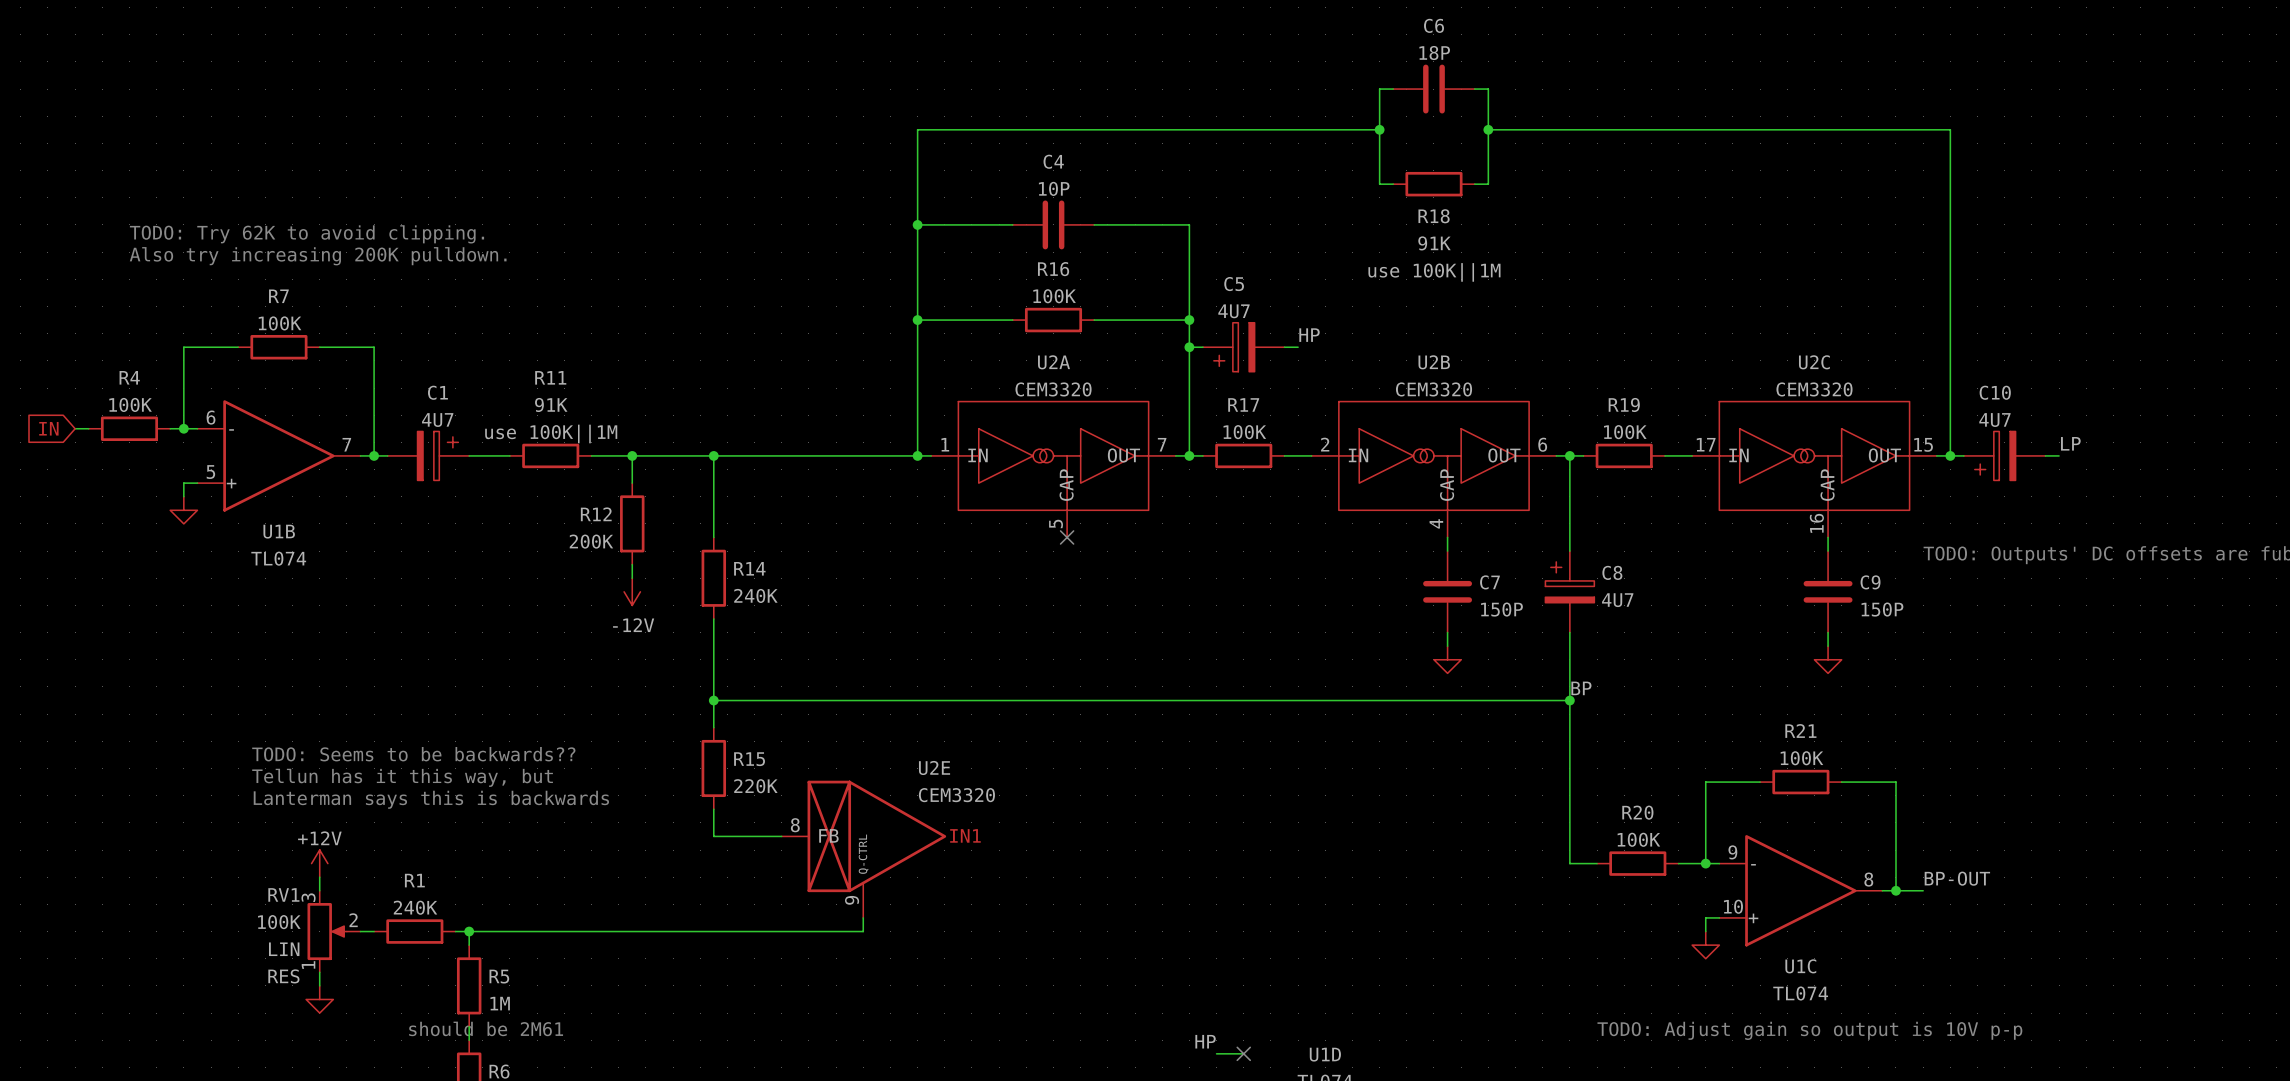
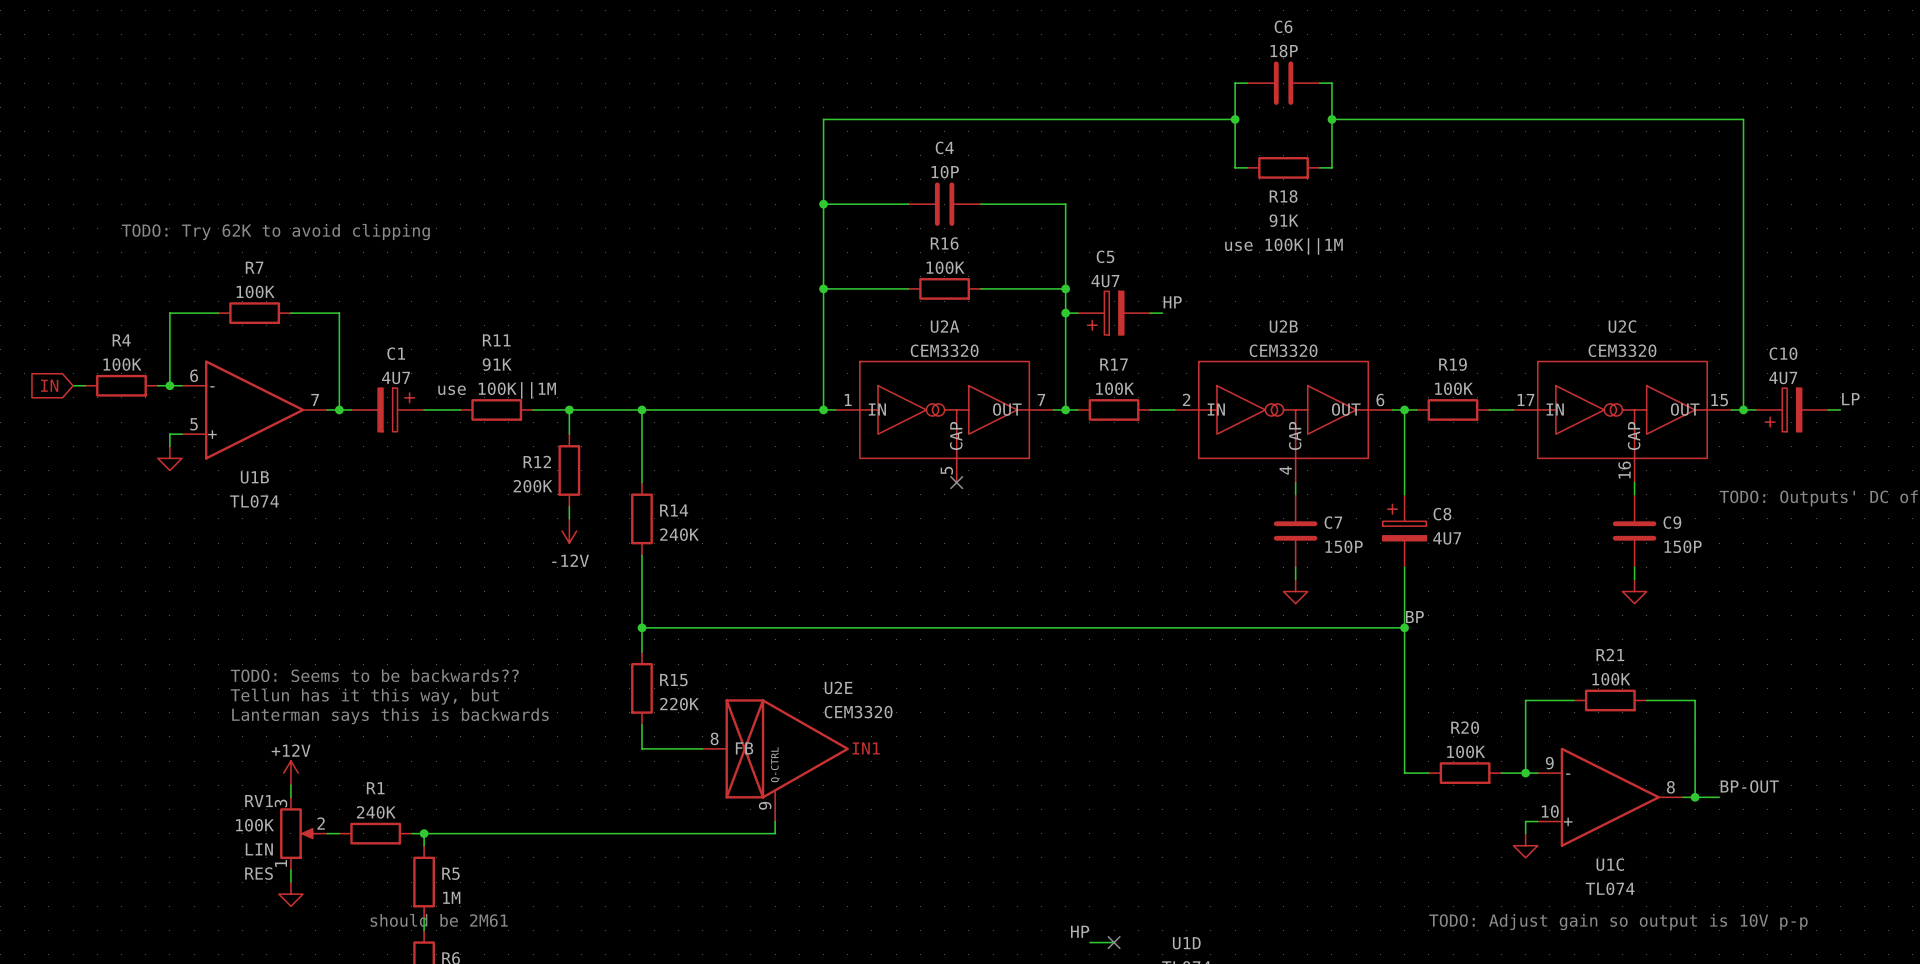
text: TODO: Try 62K to avoid clipping. (306, 234) -> none
text: Also try increasing 200K pulldown. (318, 256) -> TODO: Try 62K to avoid clipping (275, 232)

